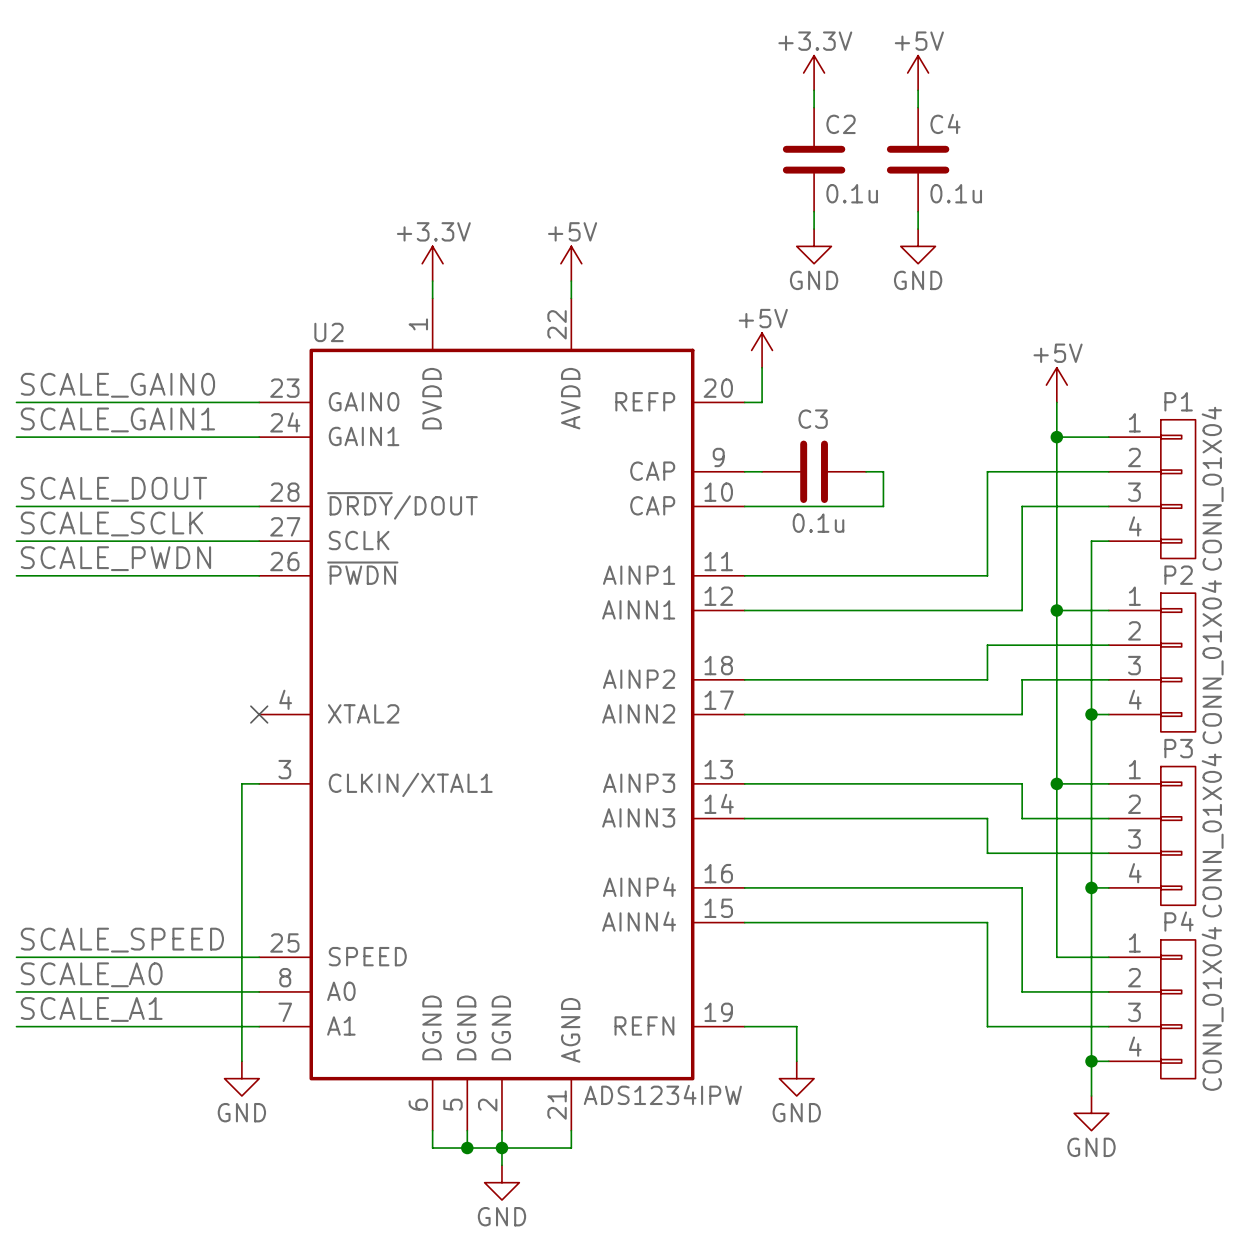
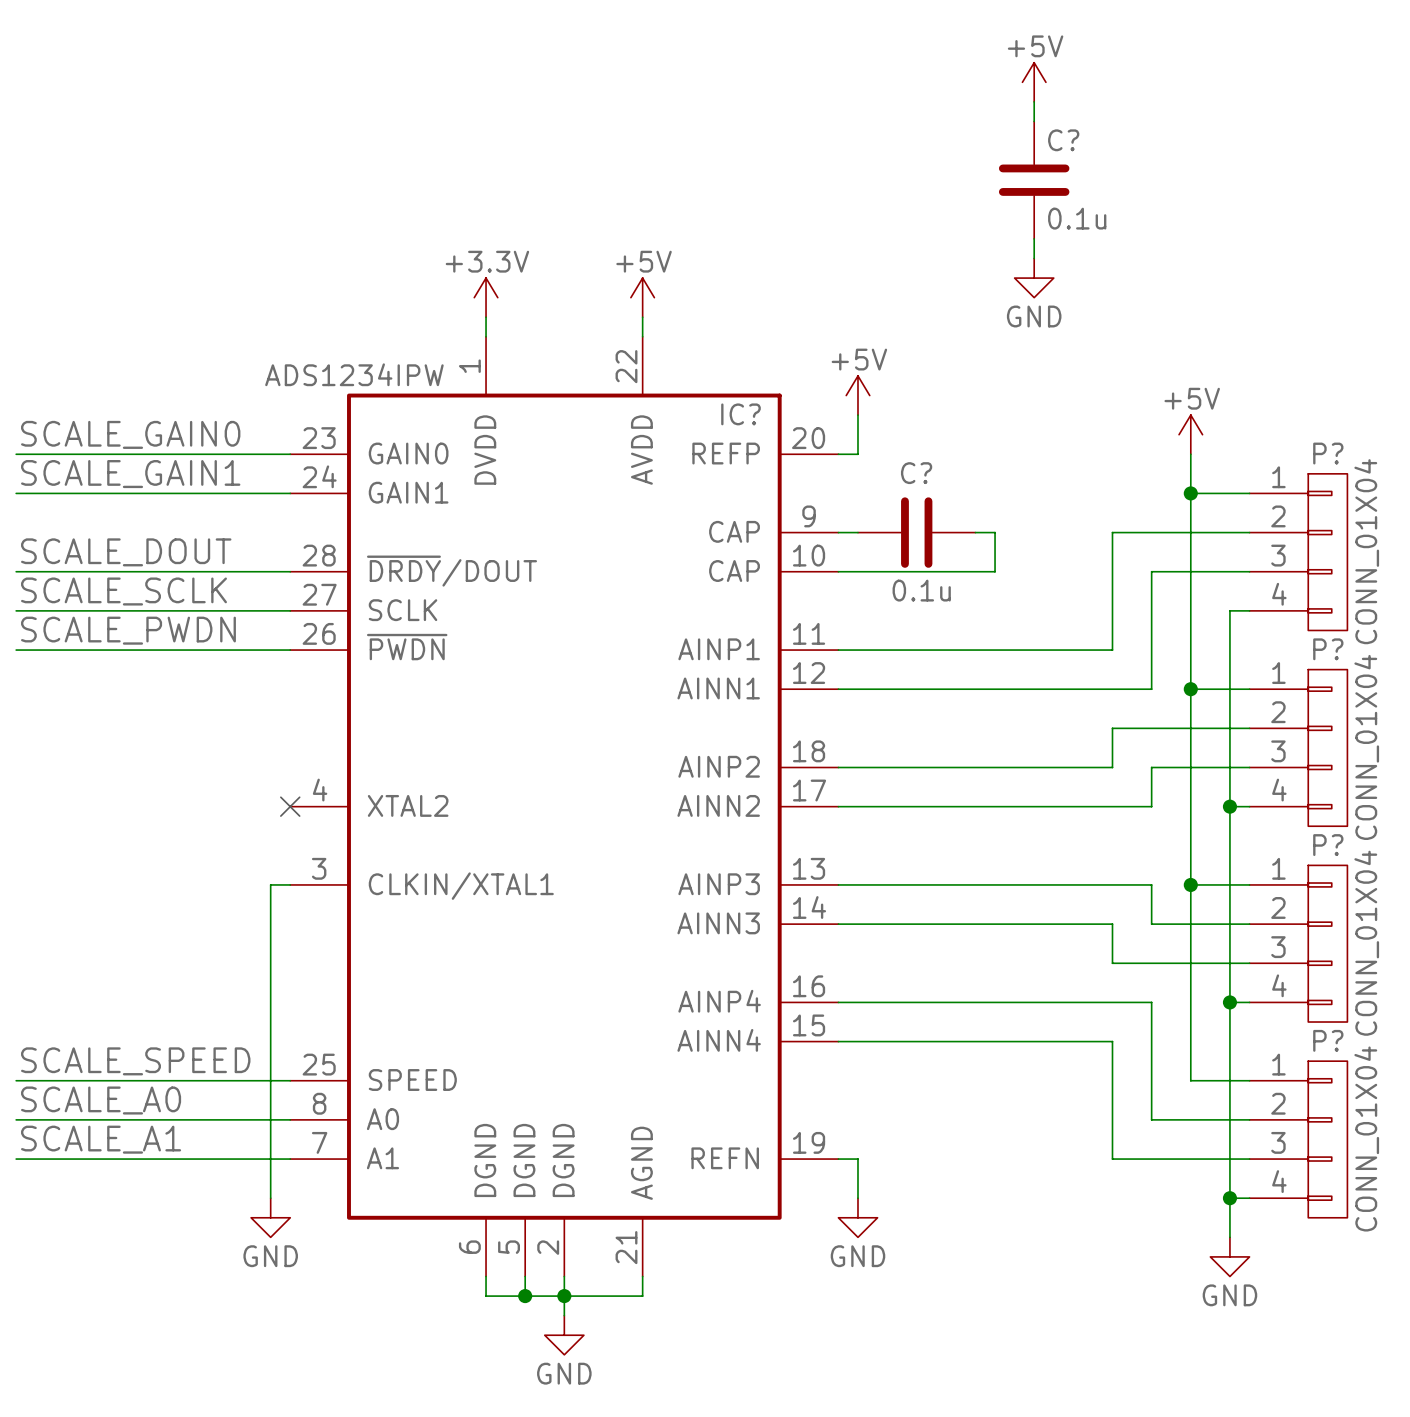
power symbol: +3.3V (814, 72) -> none
wire: (814, 90) (814, 107) -> none
C4 name: C4 (945, 123) -> C? (1063, 140)
C2: 0.1u (814, 159) -> none
wire: (814, 211) (814, 229) -> none
power symbol: GND (814, 246) -> none
U2 name: U2 (329, 332) -> IC? (740, 414)
P1 name: P1 (1178, 401) -> P? (1328, 453)
C3 name: C3 (813, 419) -> C? (916, 473)
P2 name: P2 (1178, 575) -> P? (1328, 649)
P3 name: P3 (1178, 748) -> P? (1328, 845)
P4 name: P4 (1179, 921) -> P? (1328, 1040)
wire: (762, 1026) (796, 1026) (796, 1061) -> (857, 1159) (857, 1198)
power symbol position: GND (796, 1078) -> GND (857, 1217)
U2 value position: ADS1234IPW (662, 1094) -> ADS1234IPW (354, 374)

